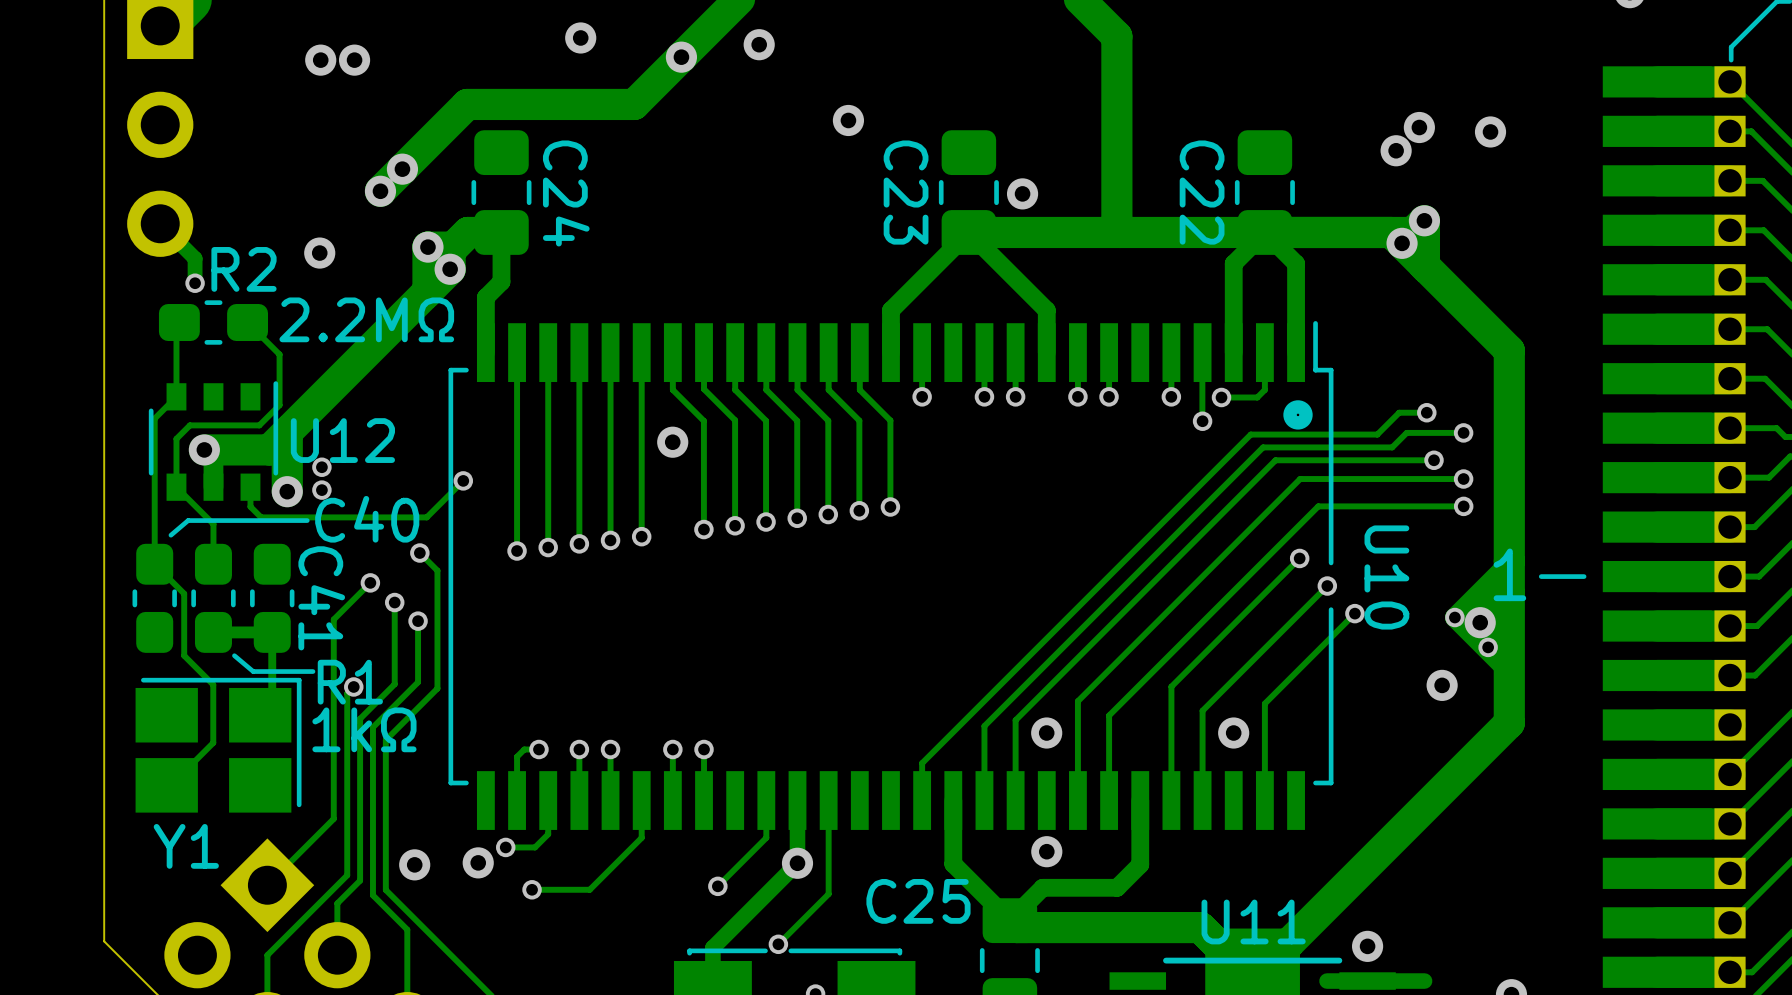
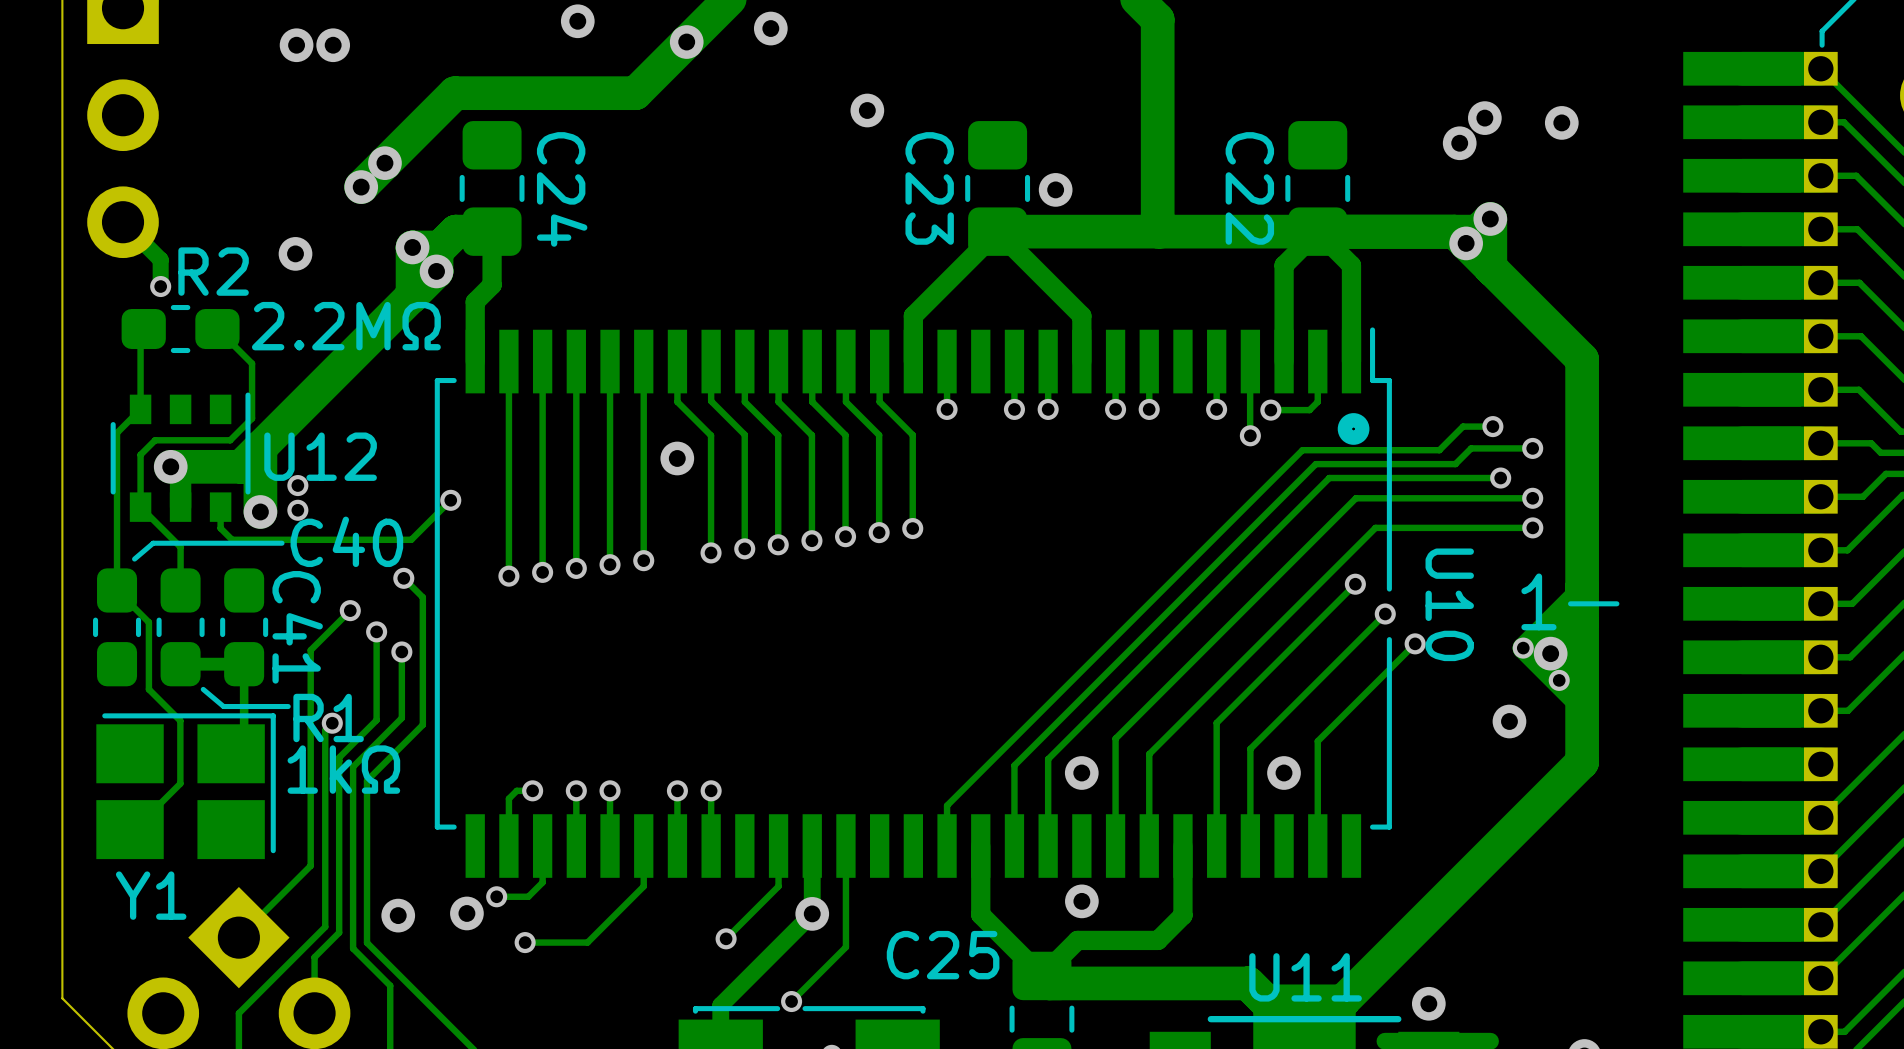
text position: 1 (1509, 574) -> 1 (1538, 601)
line: (1584, 576) (1541, 576) -> (1570, 603) (1616, 603)

